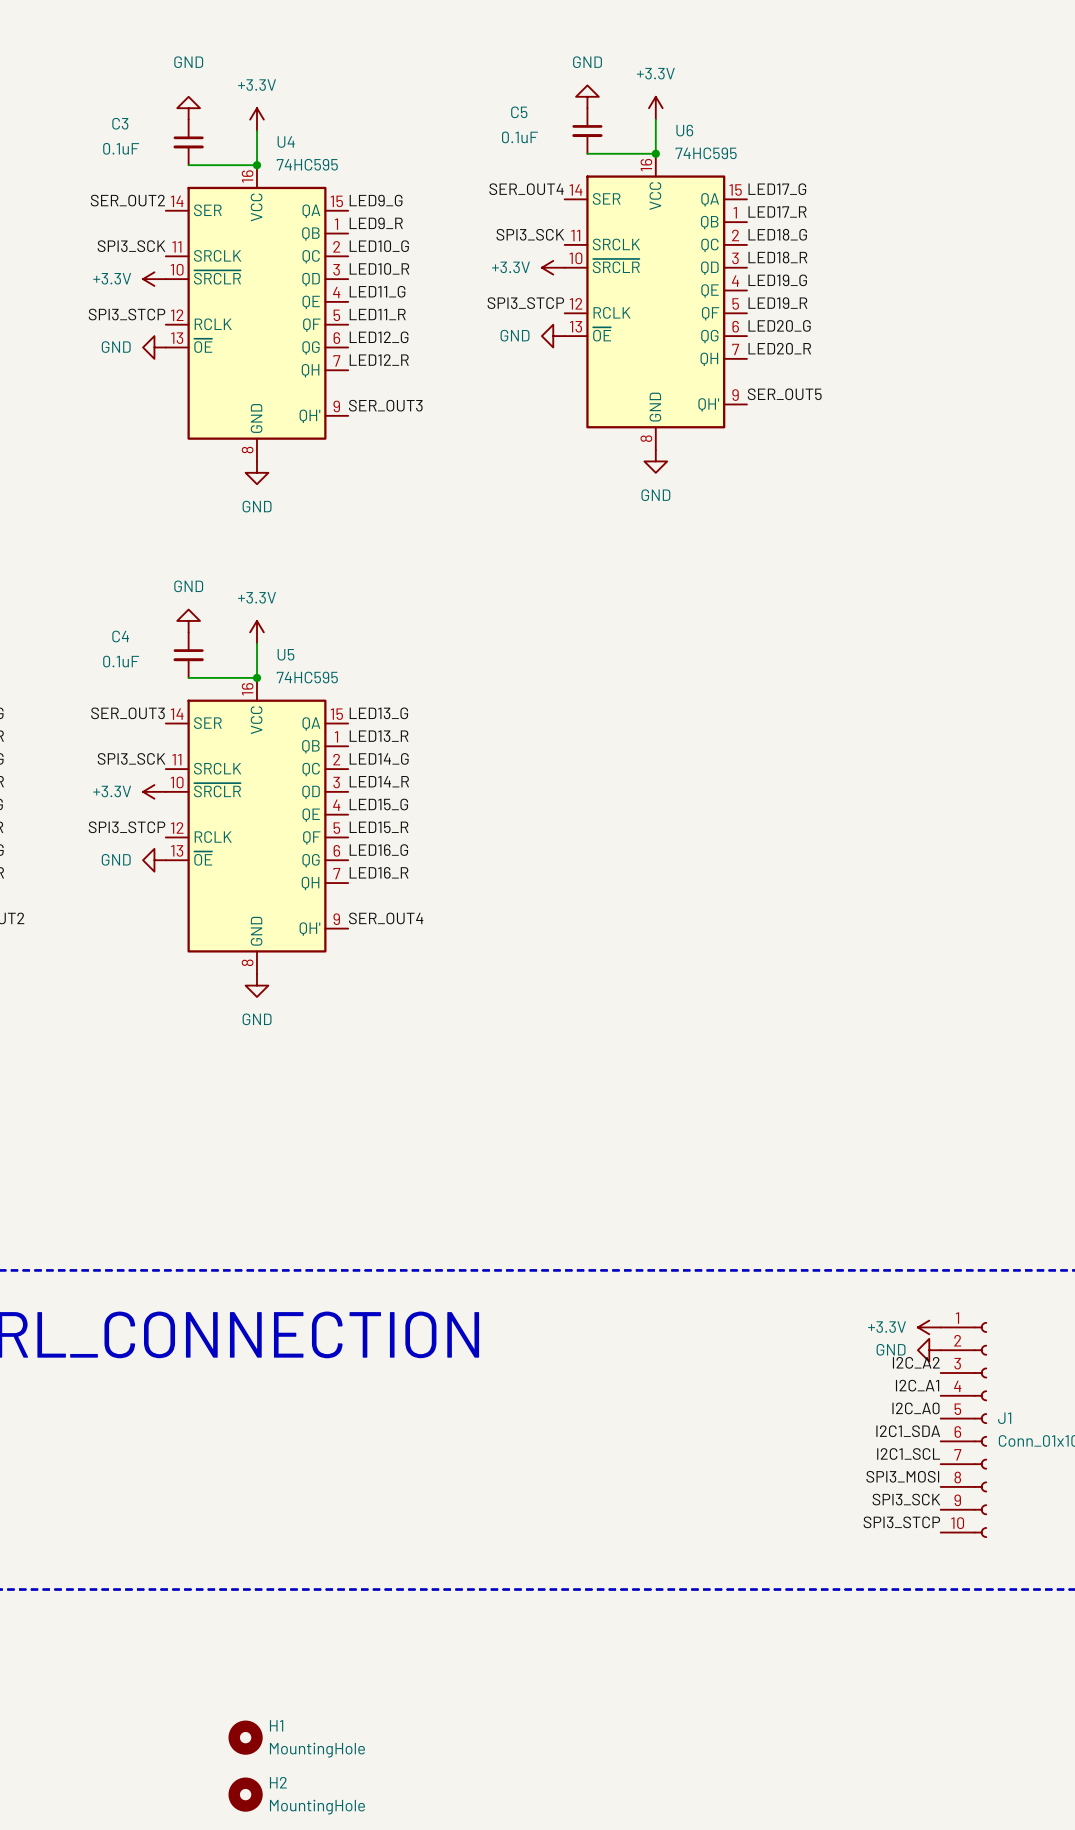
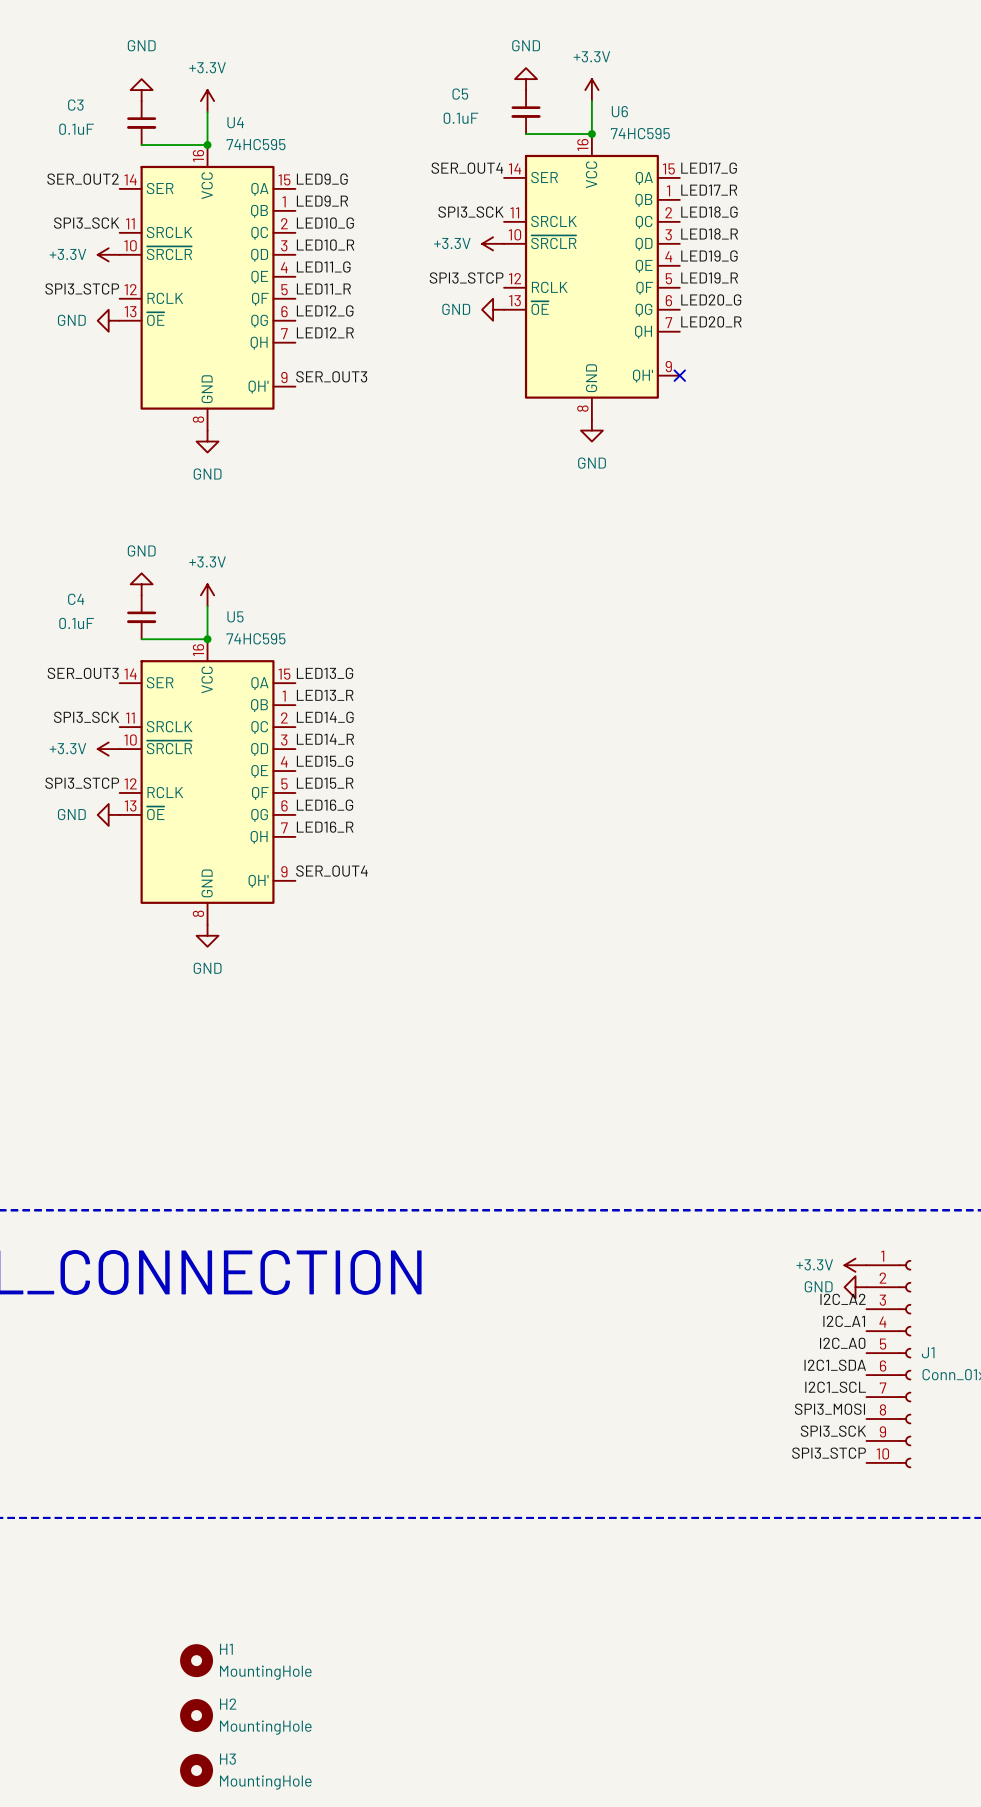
label: SER_OUT5 (784, 394) -> none
no-connect mark: none -> (679, 375)

